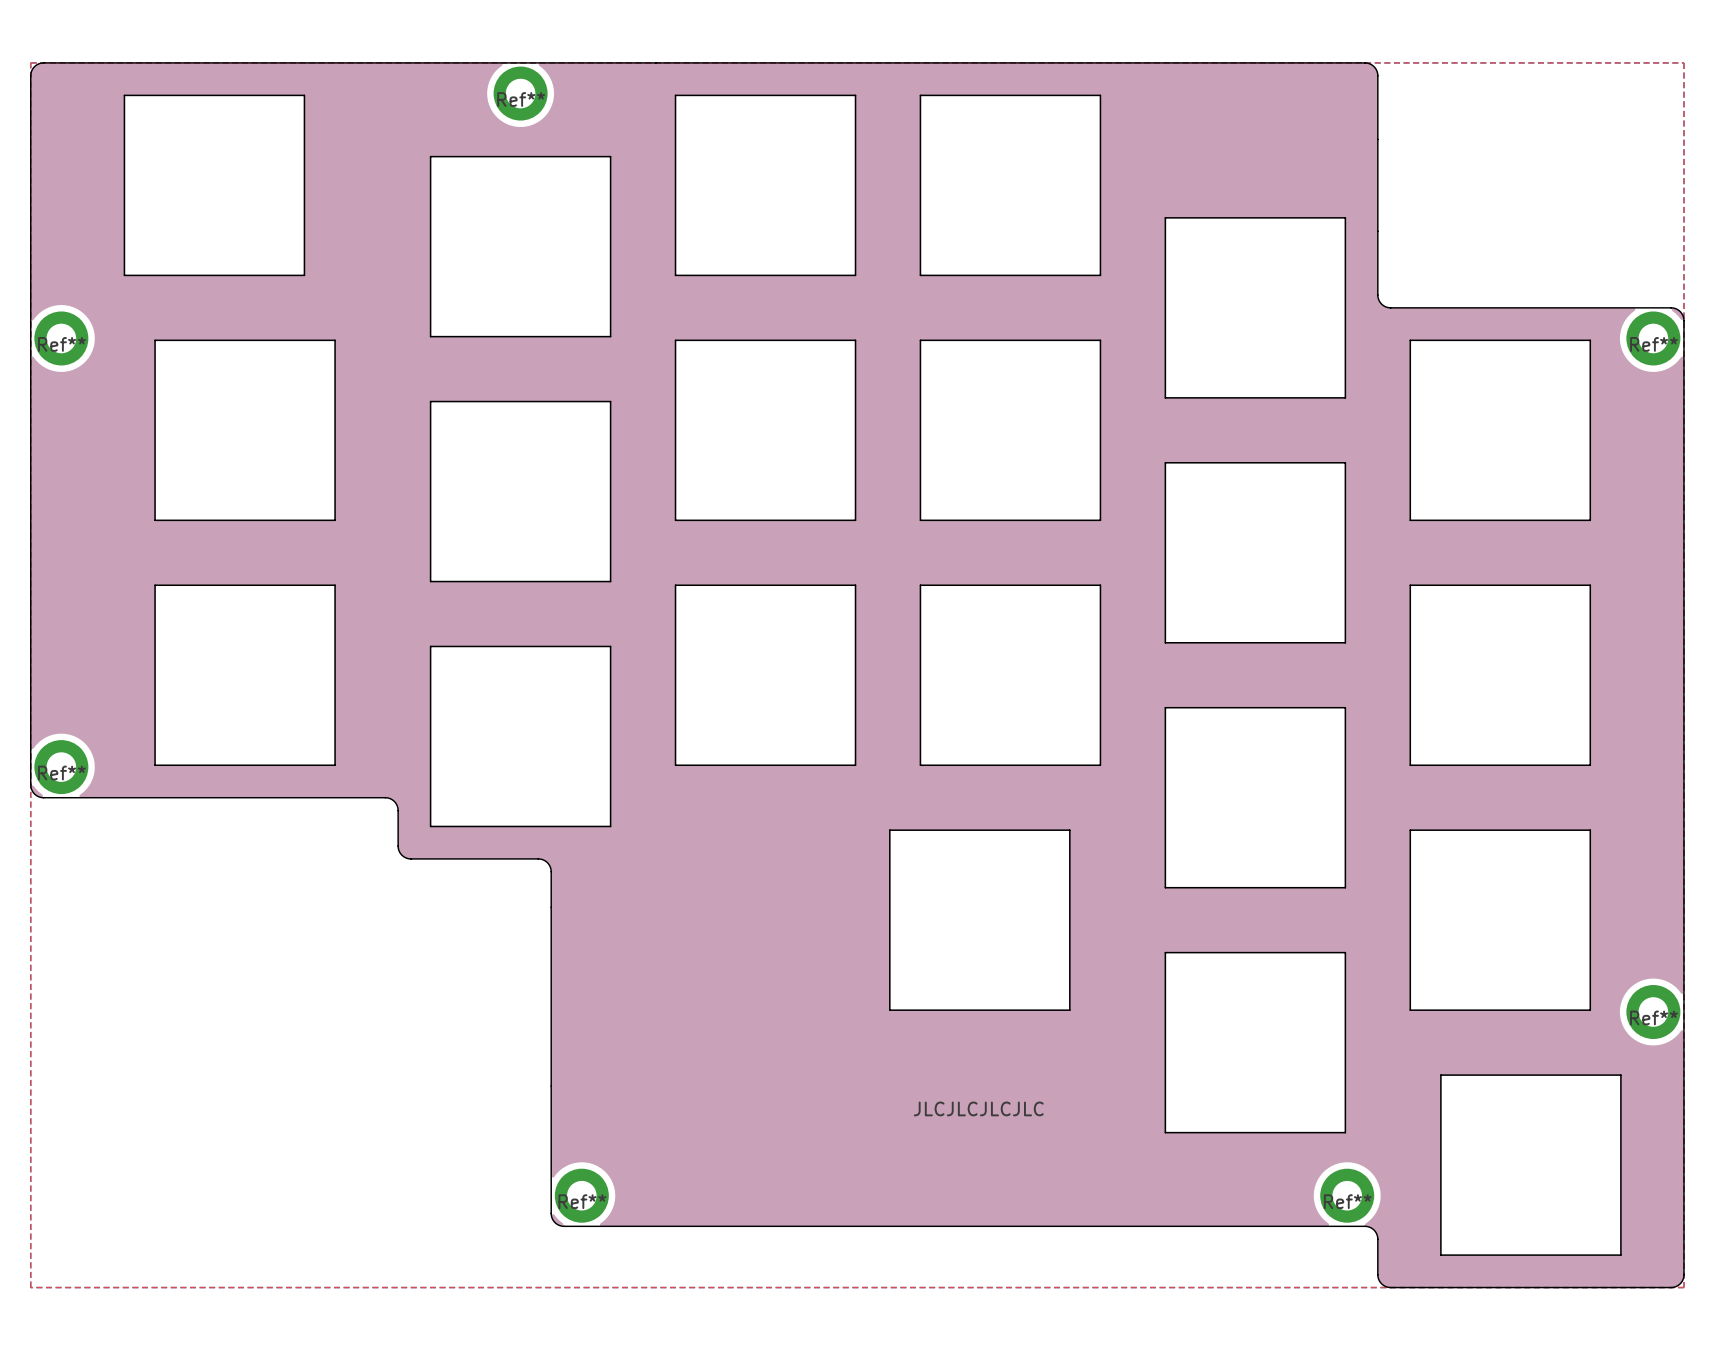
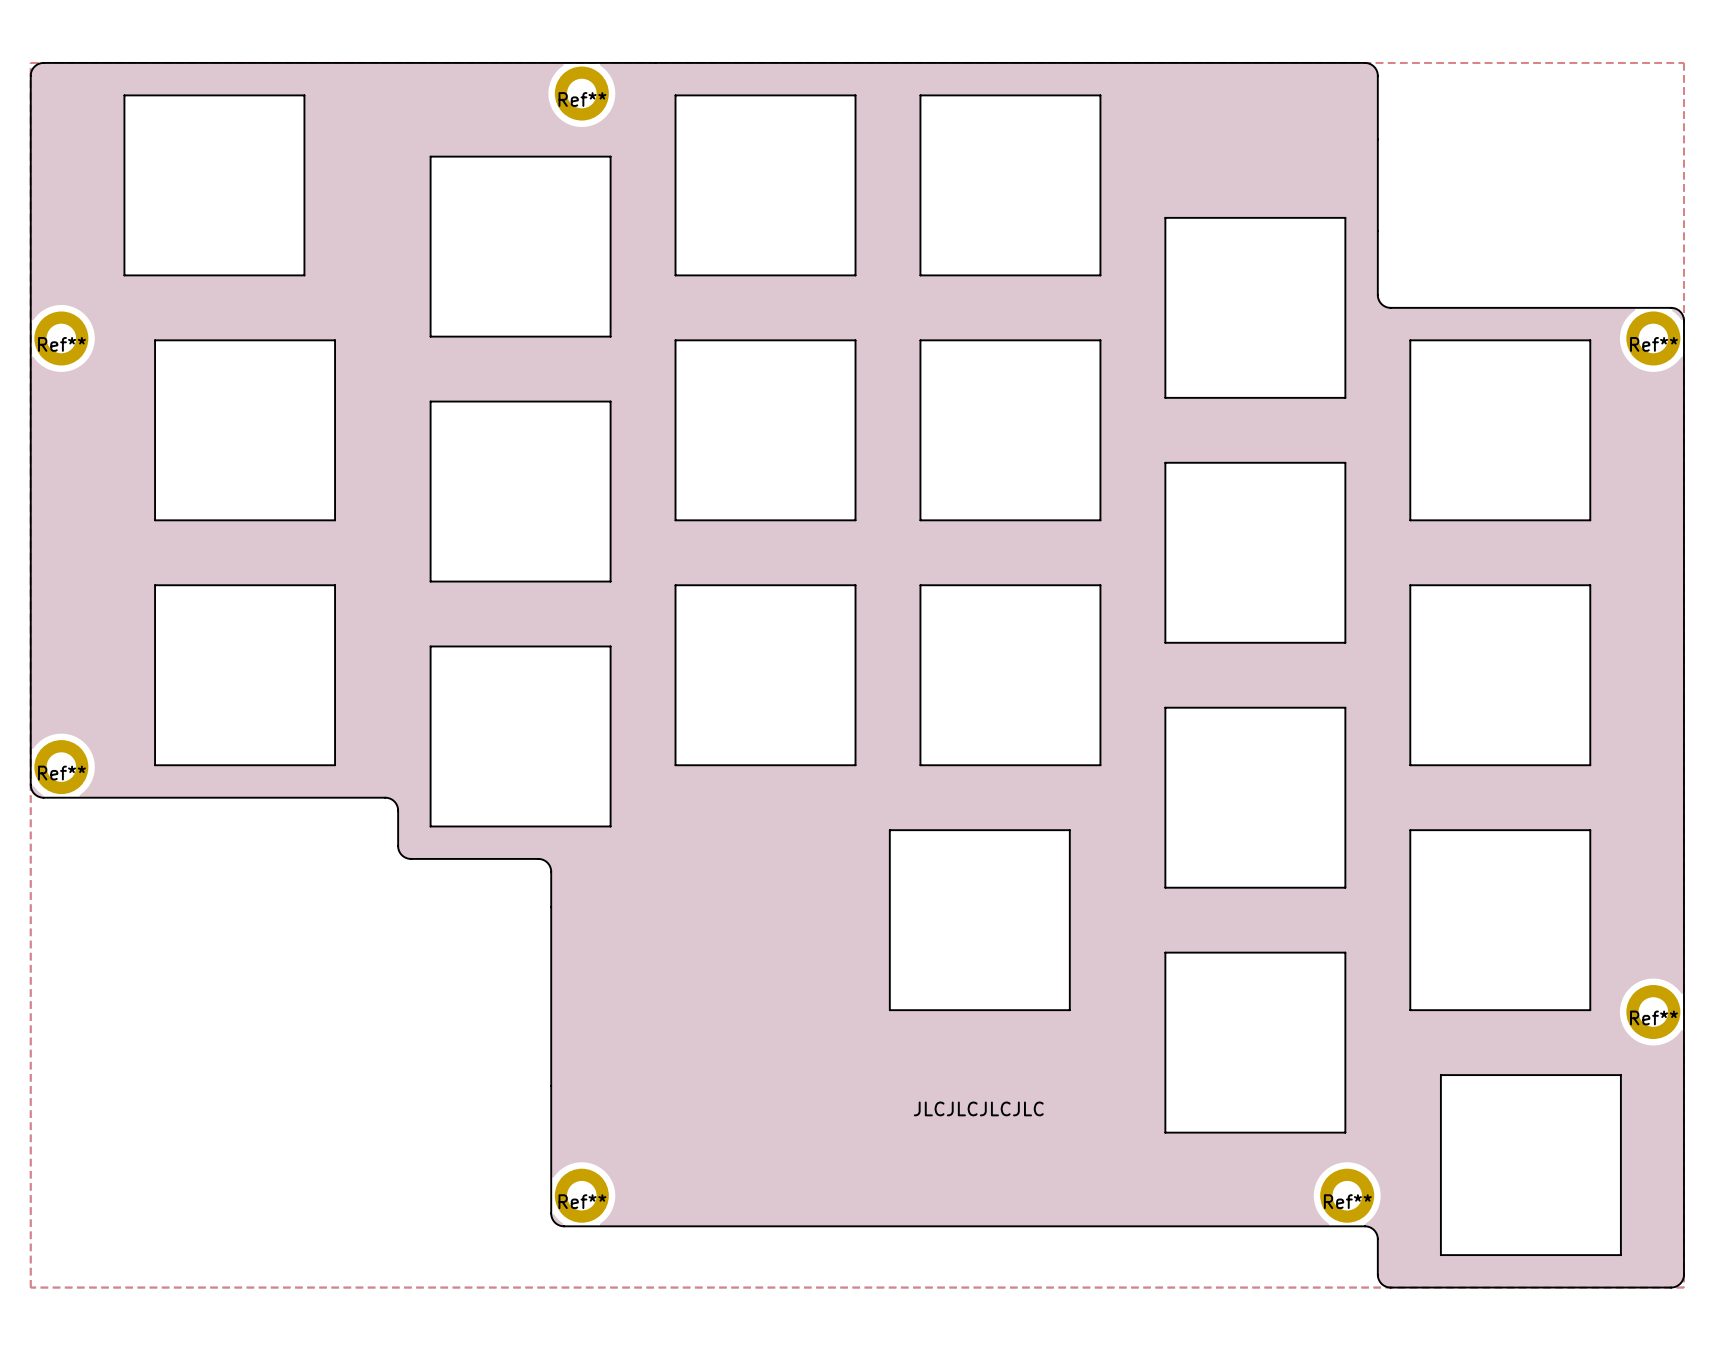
Ref** position: (520, 93) -> (581, 93)

